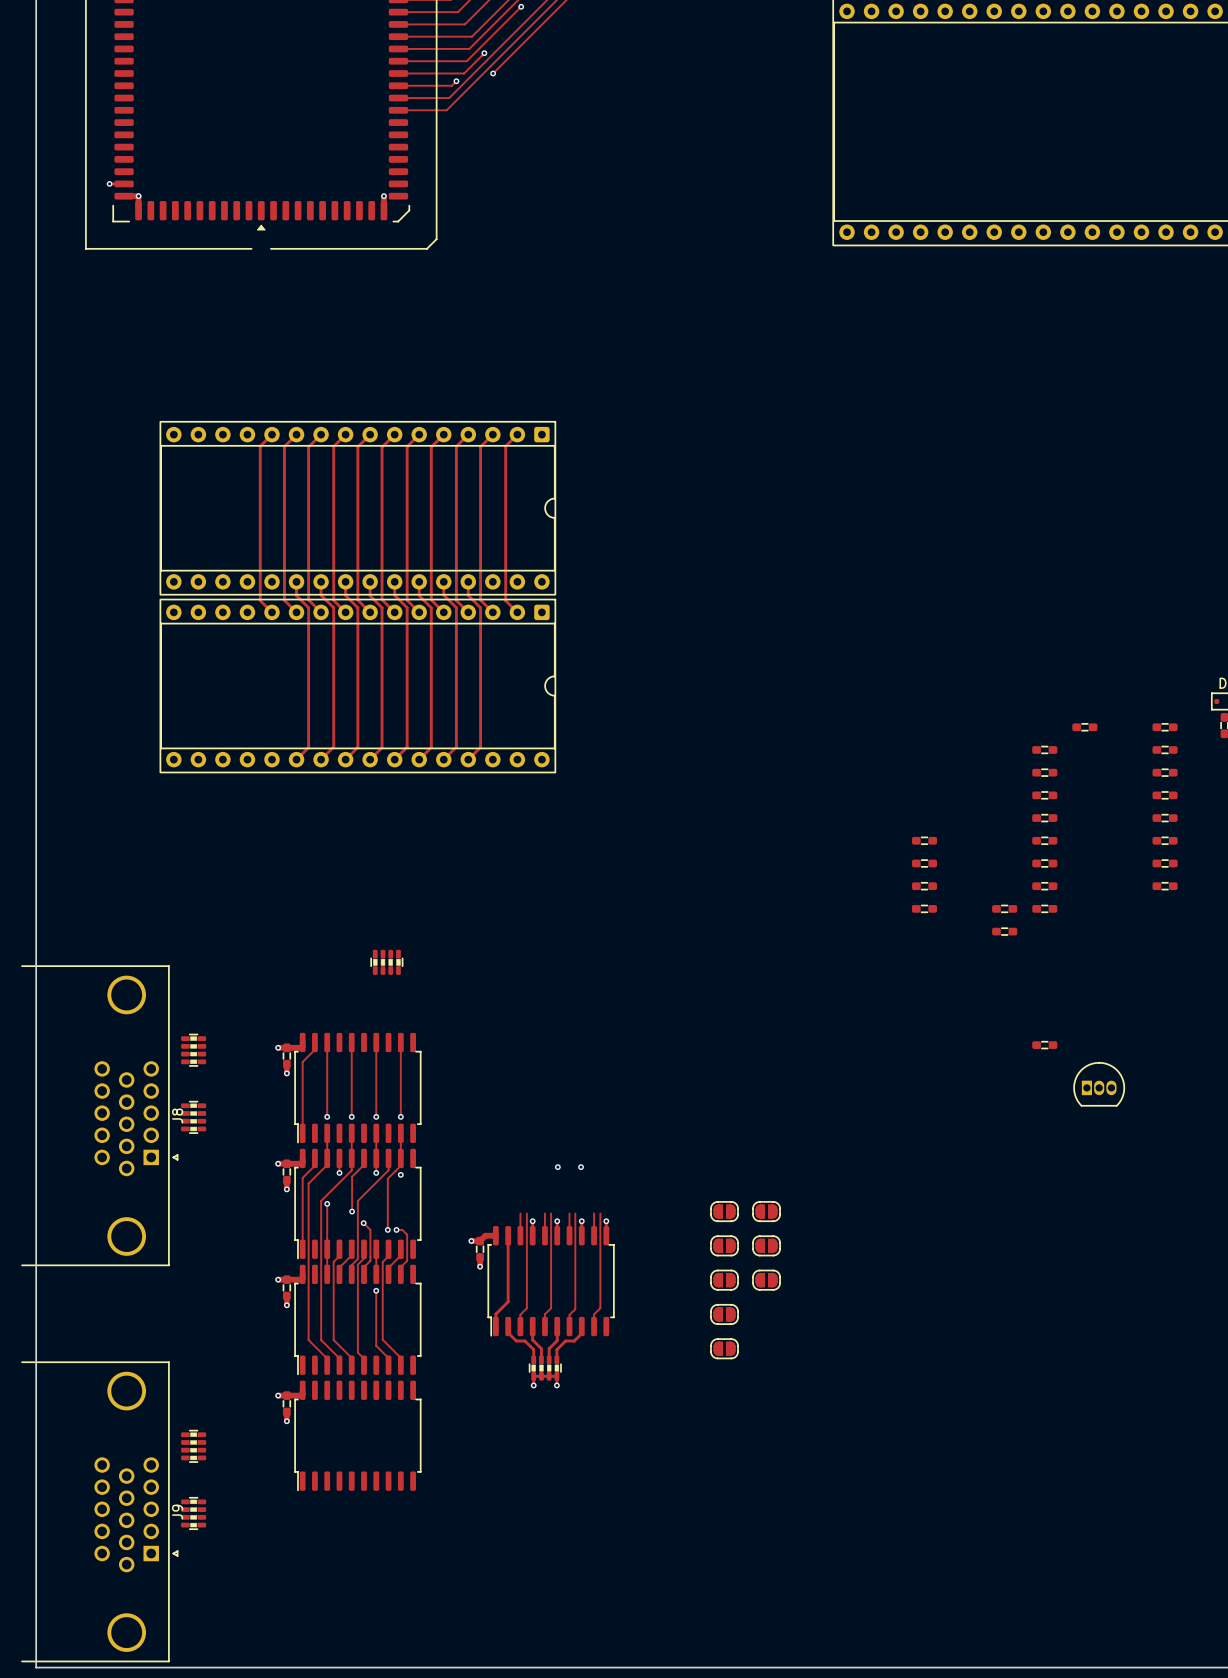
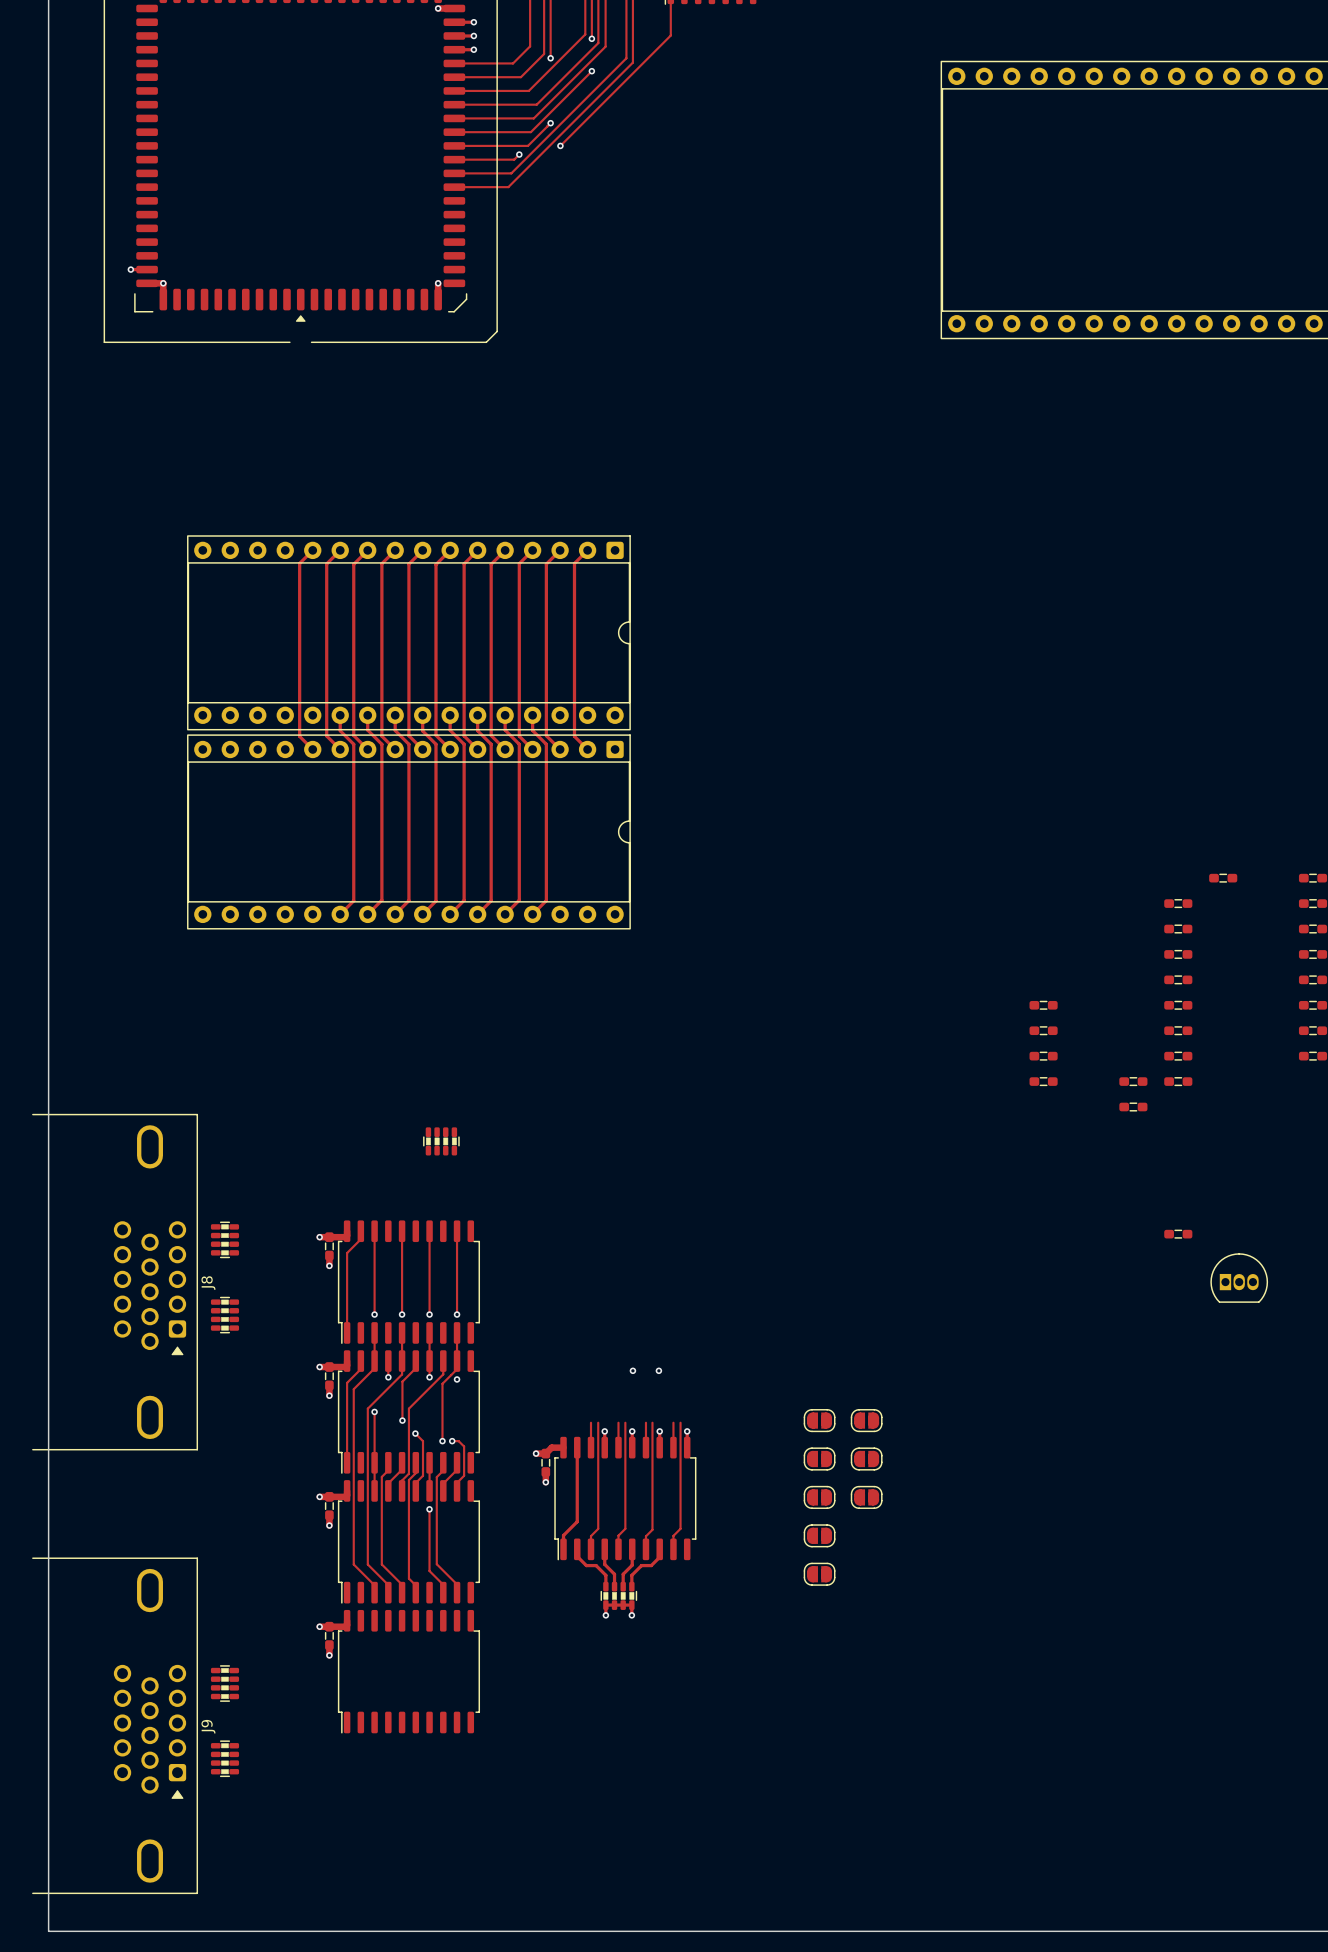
J8 footprint: [21, 965, 179, 1266] -> [32, 1113, 198, 1451]
J9 footprint: [21, 1361, 179, 1663] -> [32, 1557, 198, 1894]

